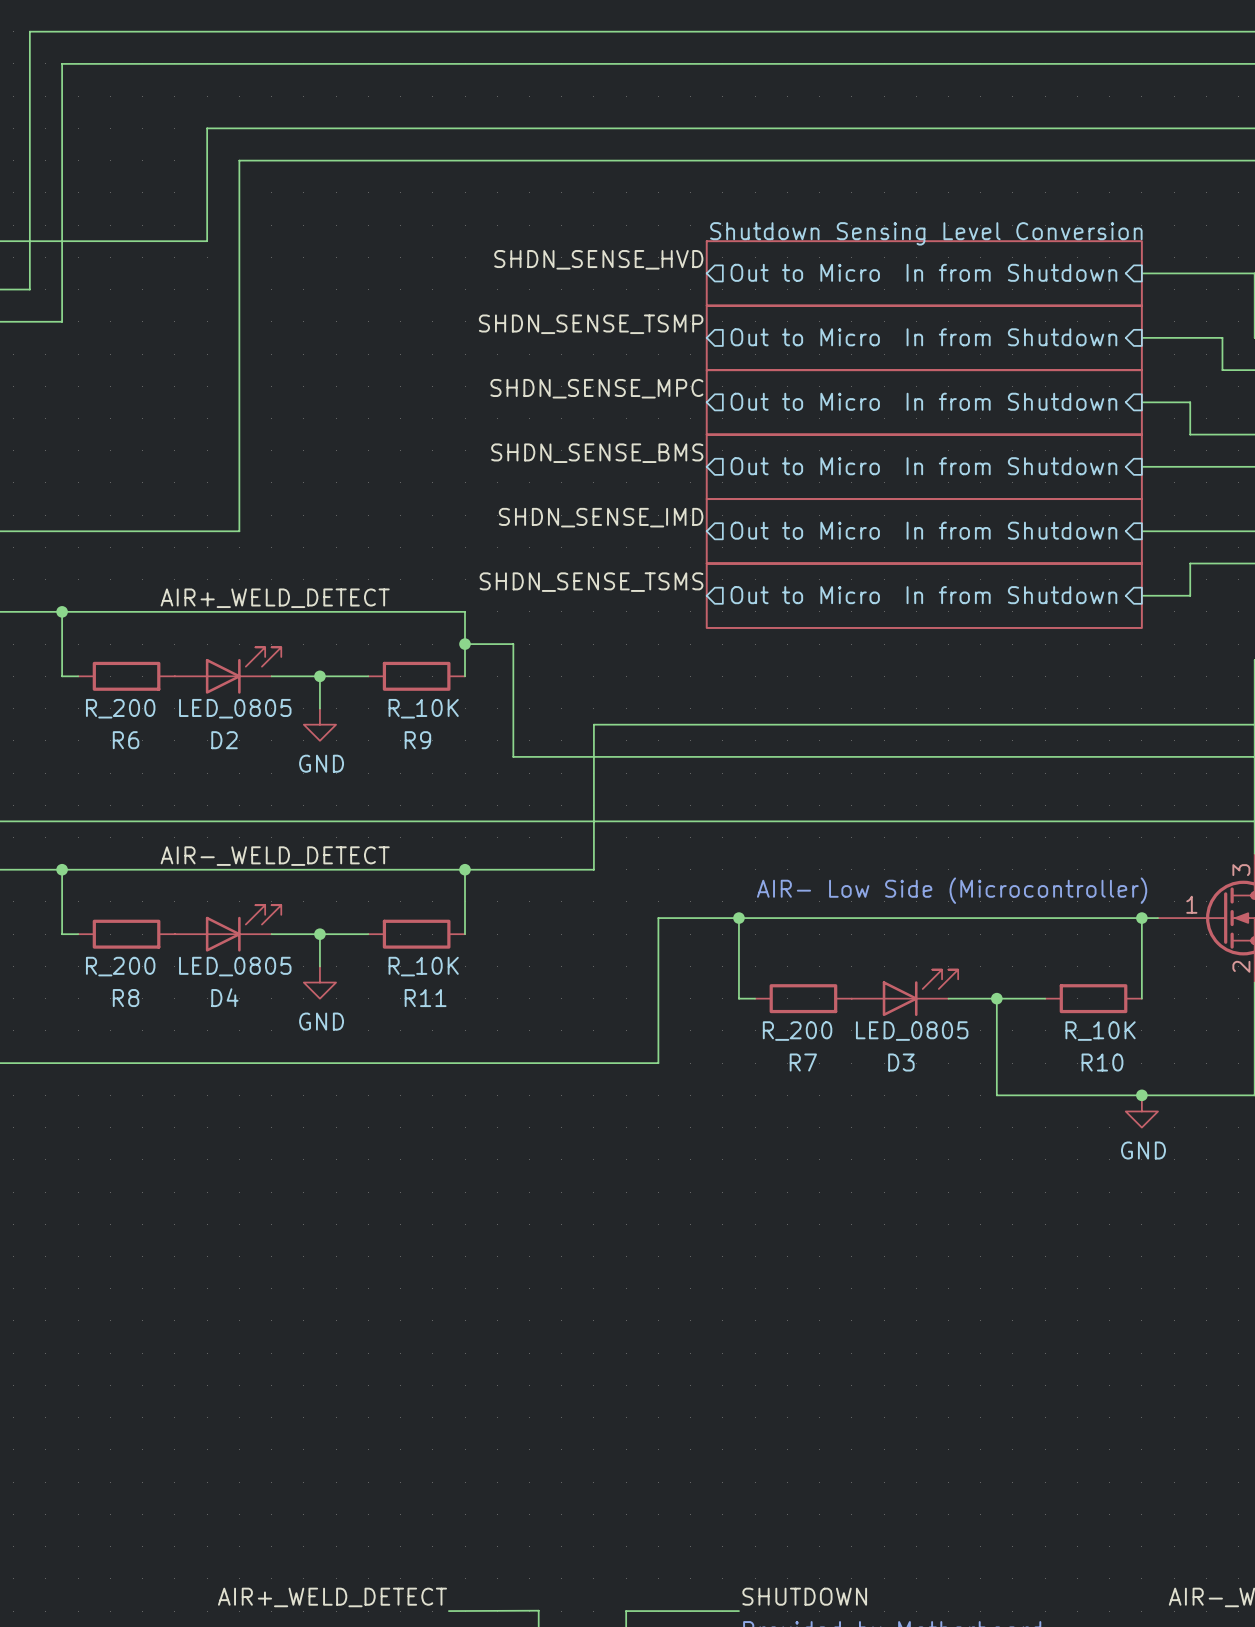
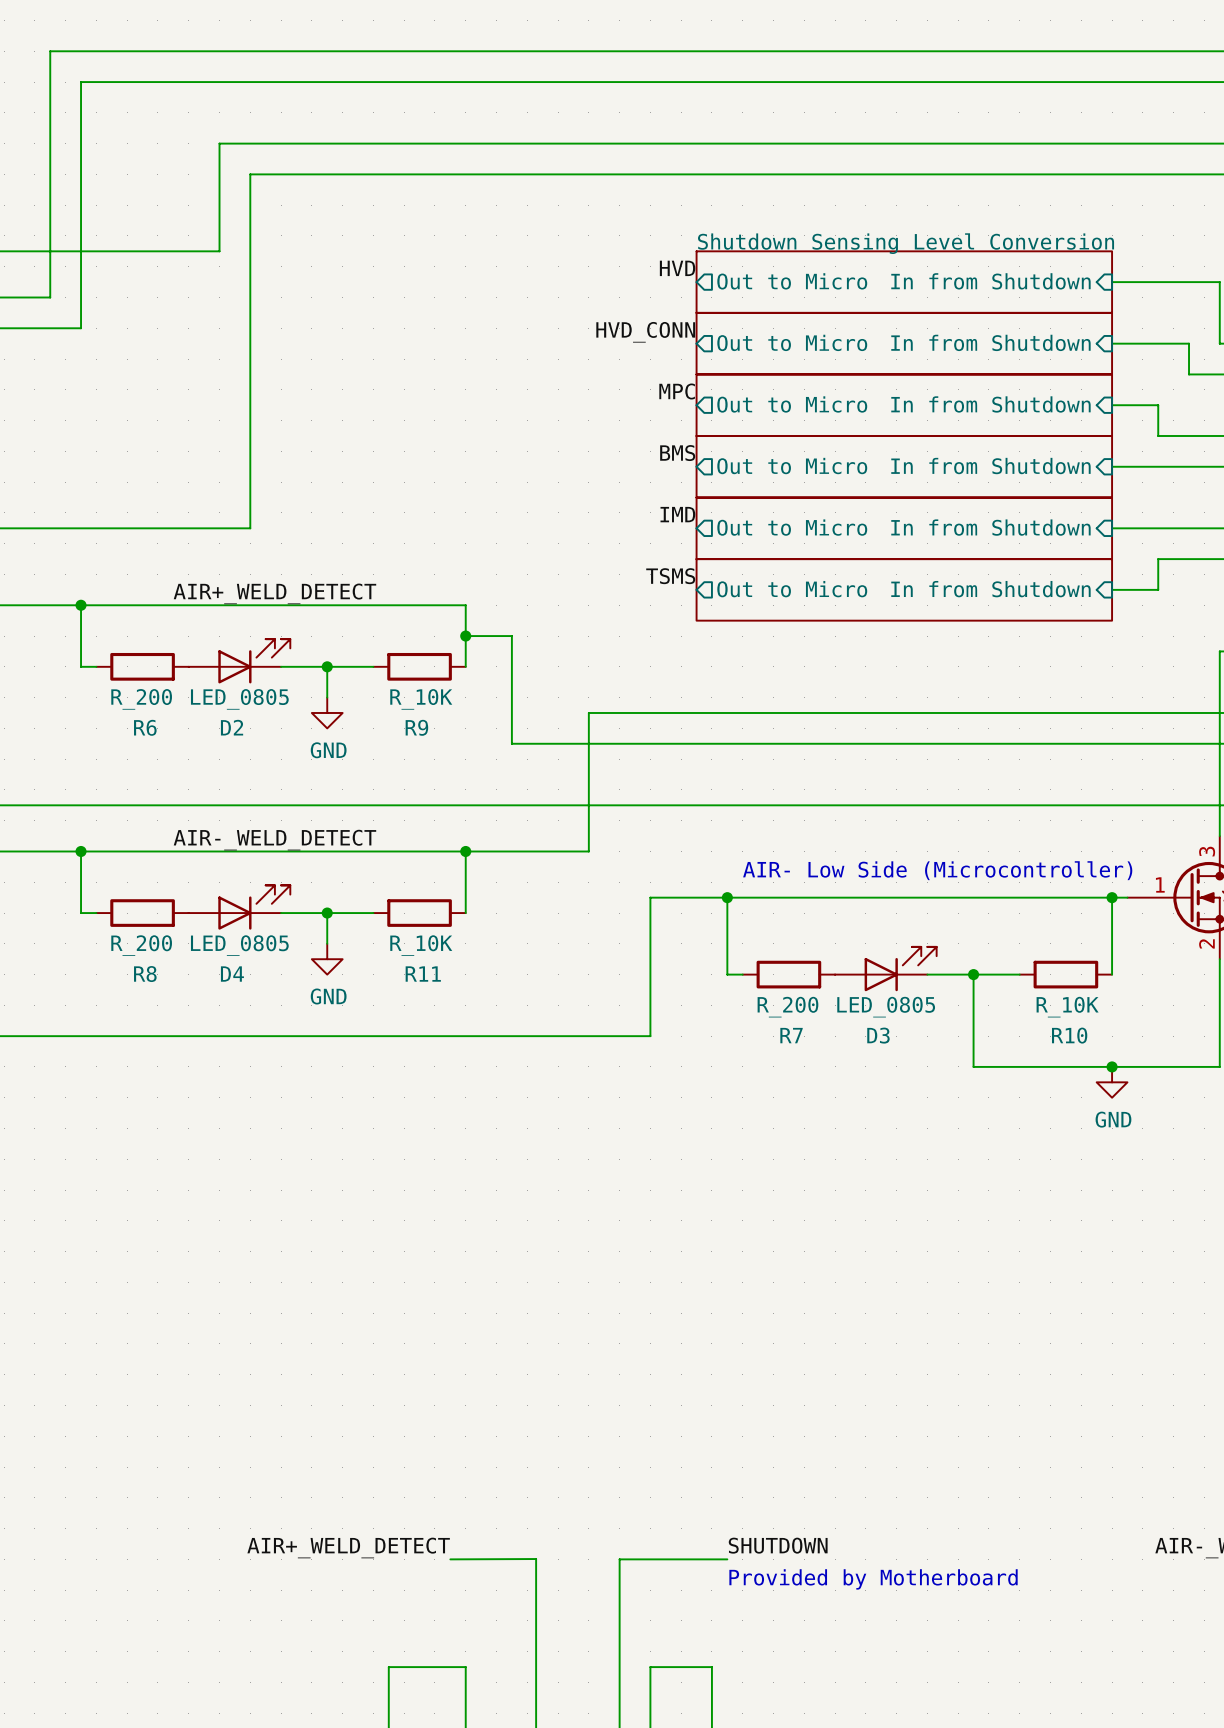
label: SHDN_SENSE_HVD (598, 259) -> HVD (677, 268)
label: SHDN_SENSE_TSMP (591, 324) -> HVD_CONN (645, 332)
label: SHDN_SENSE_MPC (596, 388) -> MPC (677, 391)
label: SHDN_SENSE_BMS (597, 453) -> BMS (677, 453)
label: SHDN_SENSE_IMD (601, 517) -> IMD (677, 514)
label: SHDN_SENSE_TSMS (591, 582) -> TSMS (670, 576)

